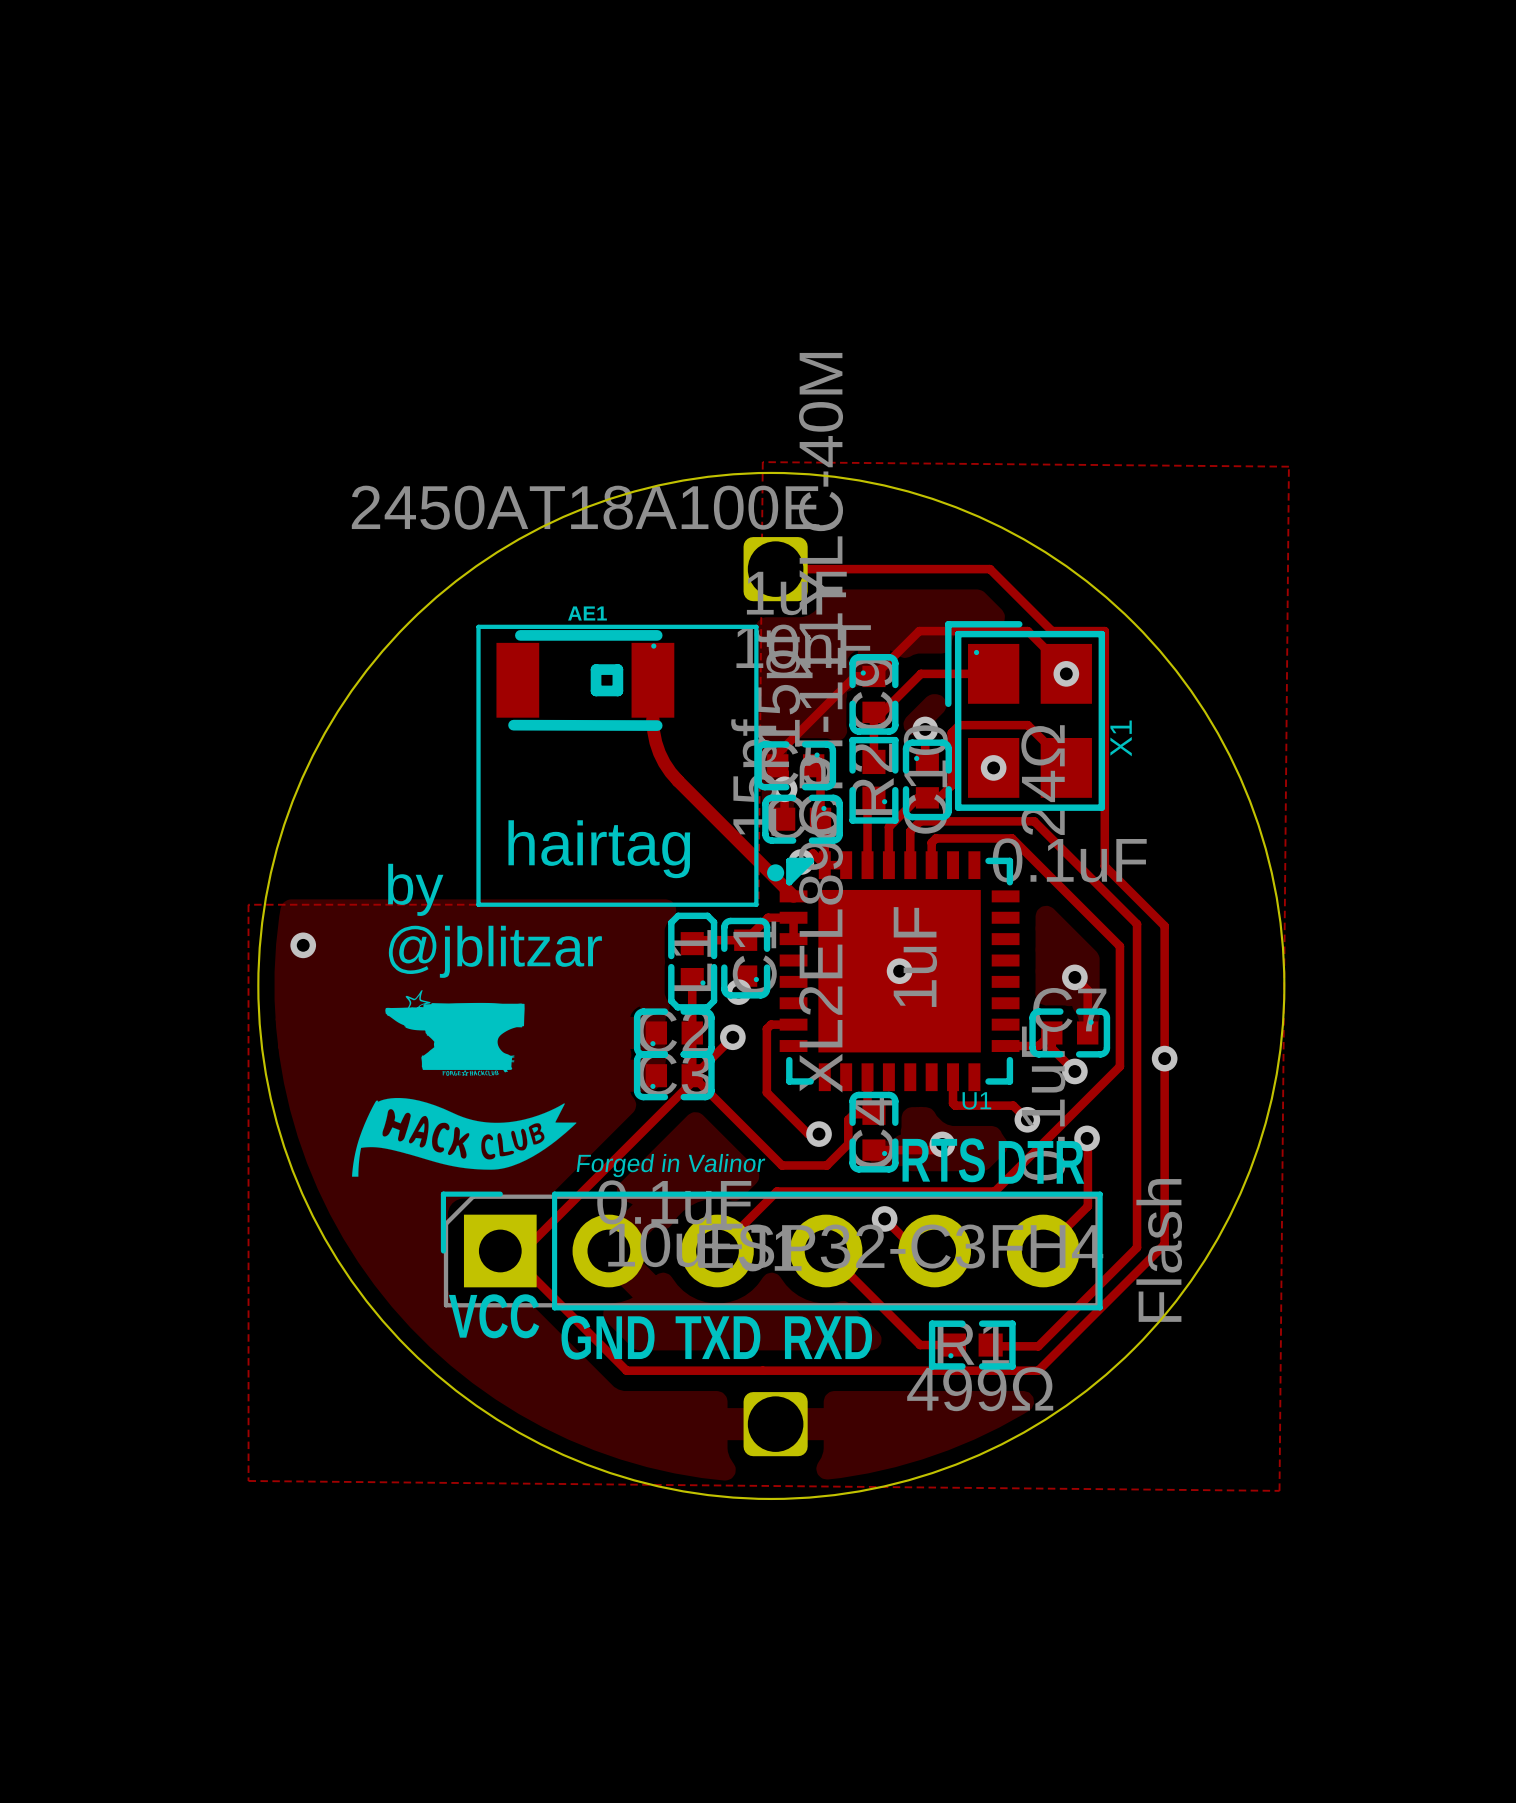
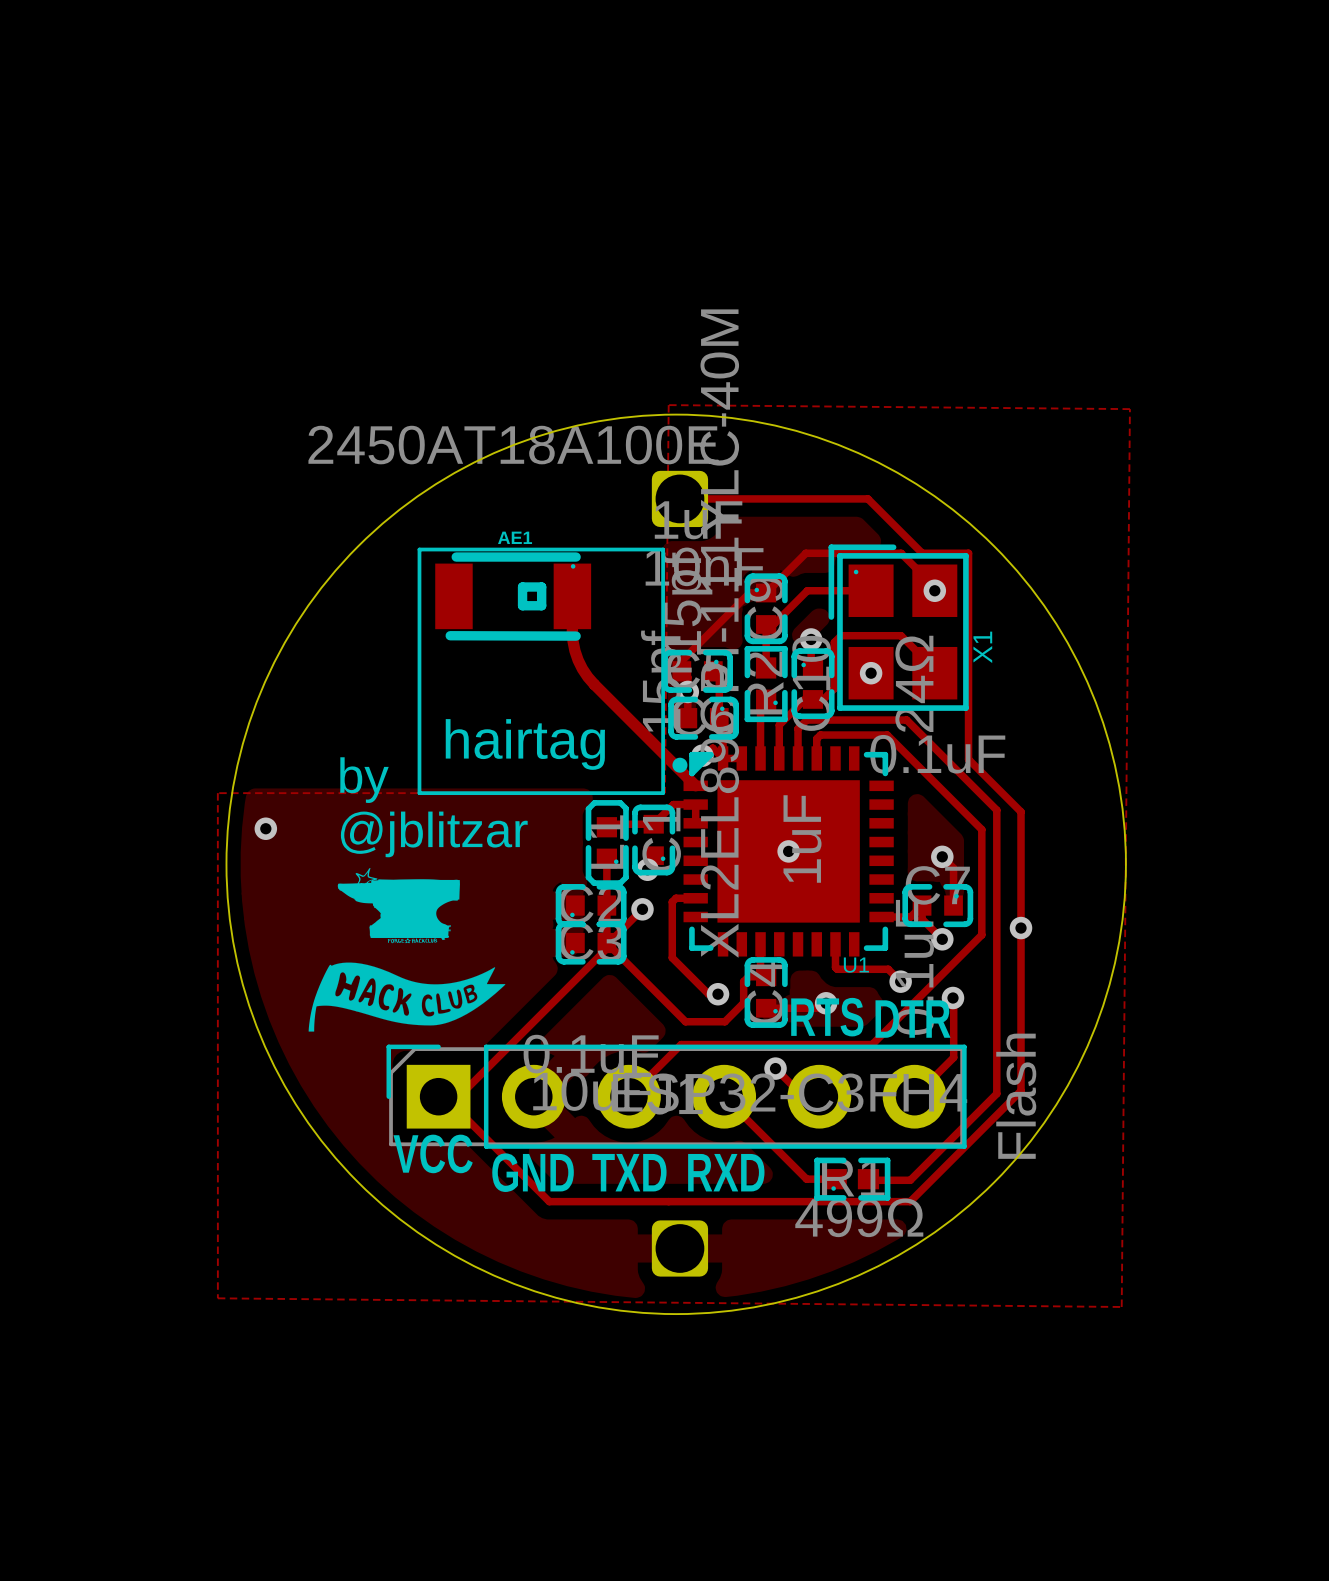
text: Forged in Valinor (670, 1165) -> none

